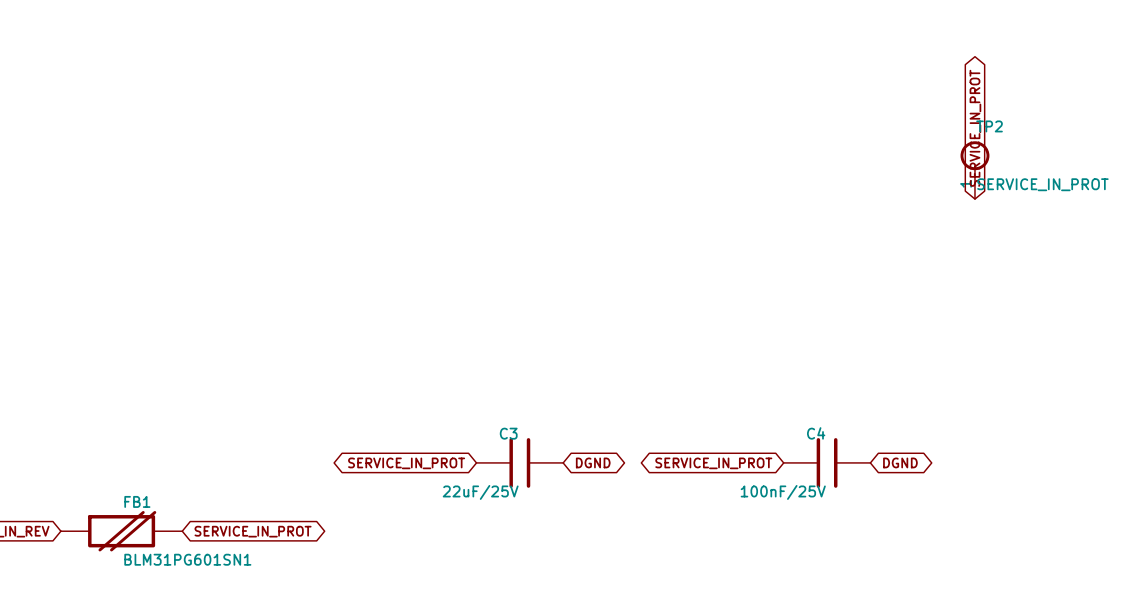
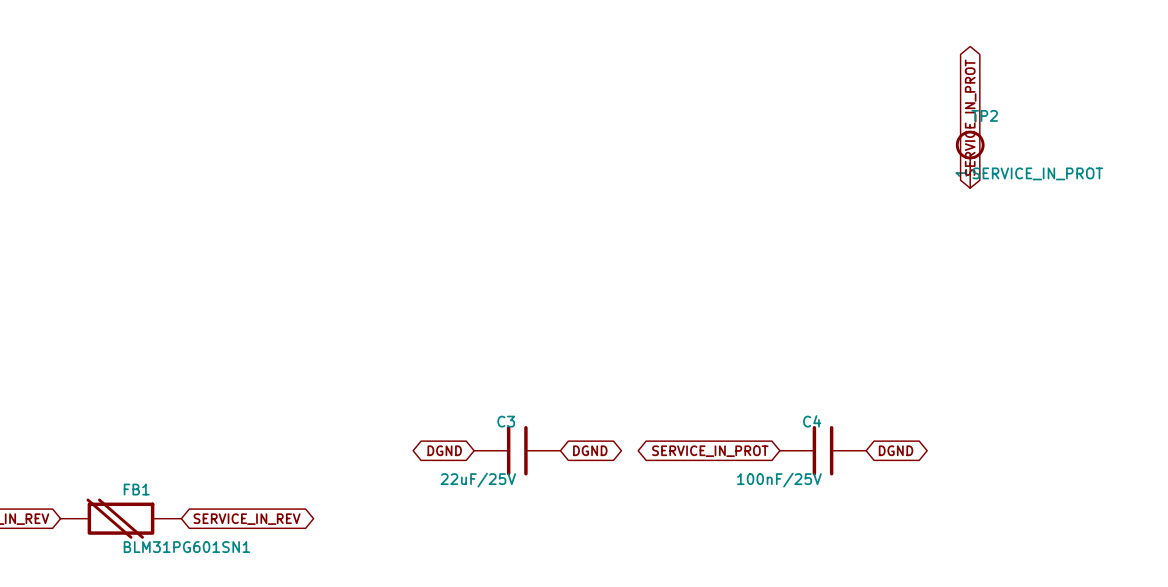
global label: SERVICE_IN_PROT (406, 463) -> DGND (444, 450)
FB1 flip: as is (122, 531) -> left-right (120, 518)
global label: SERVICE_IN_PROT (253, 531) -> SERVICE_IN_REV (247, 519)

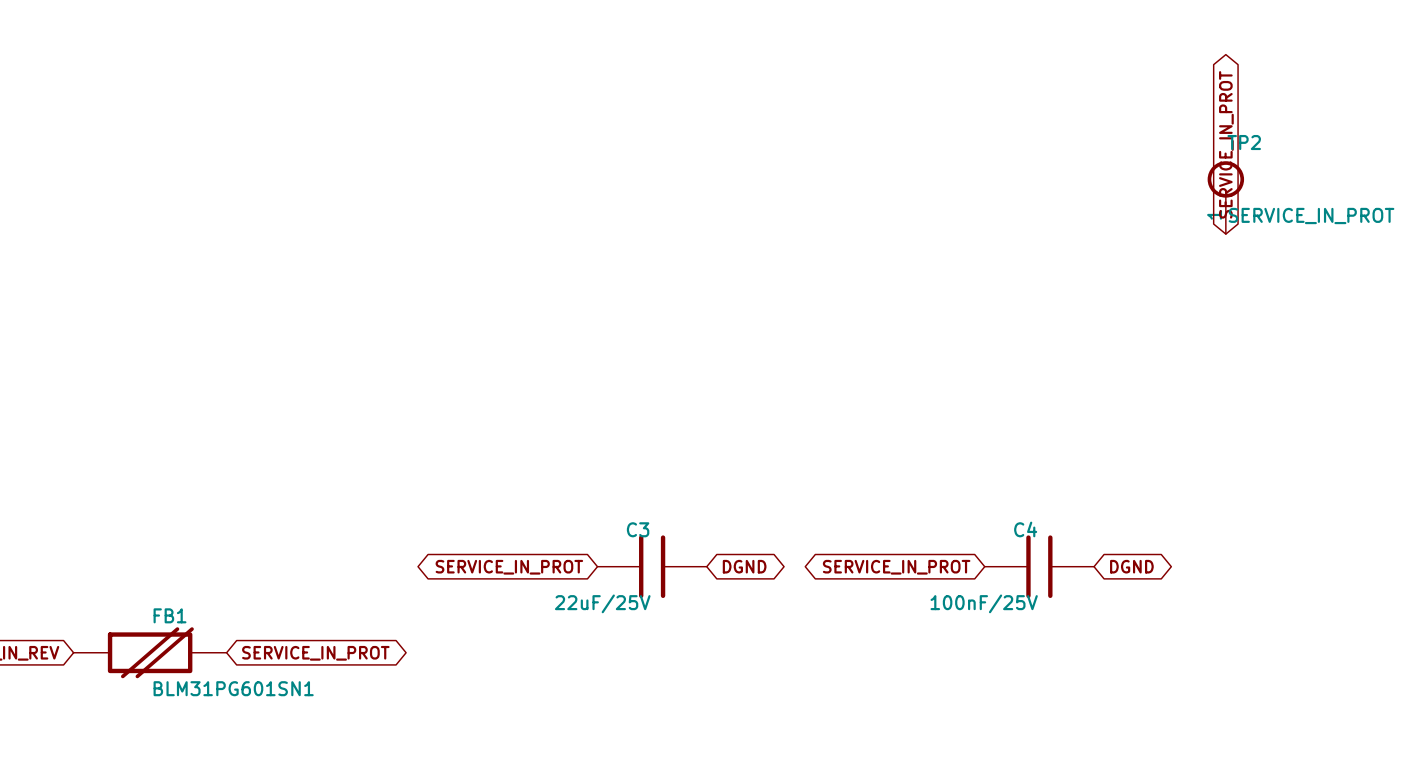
global label: DGND (444, 450) -> SERVICE_IN_PROT (509, 567)
FB1 flip: as is (120, 518) -> left-right (150, 652)
global label: SERVICE_IN_REV (247, 519) -> SERVICE_IN_PROT (315, 653)

